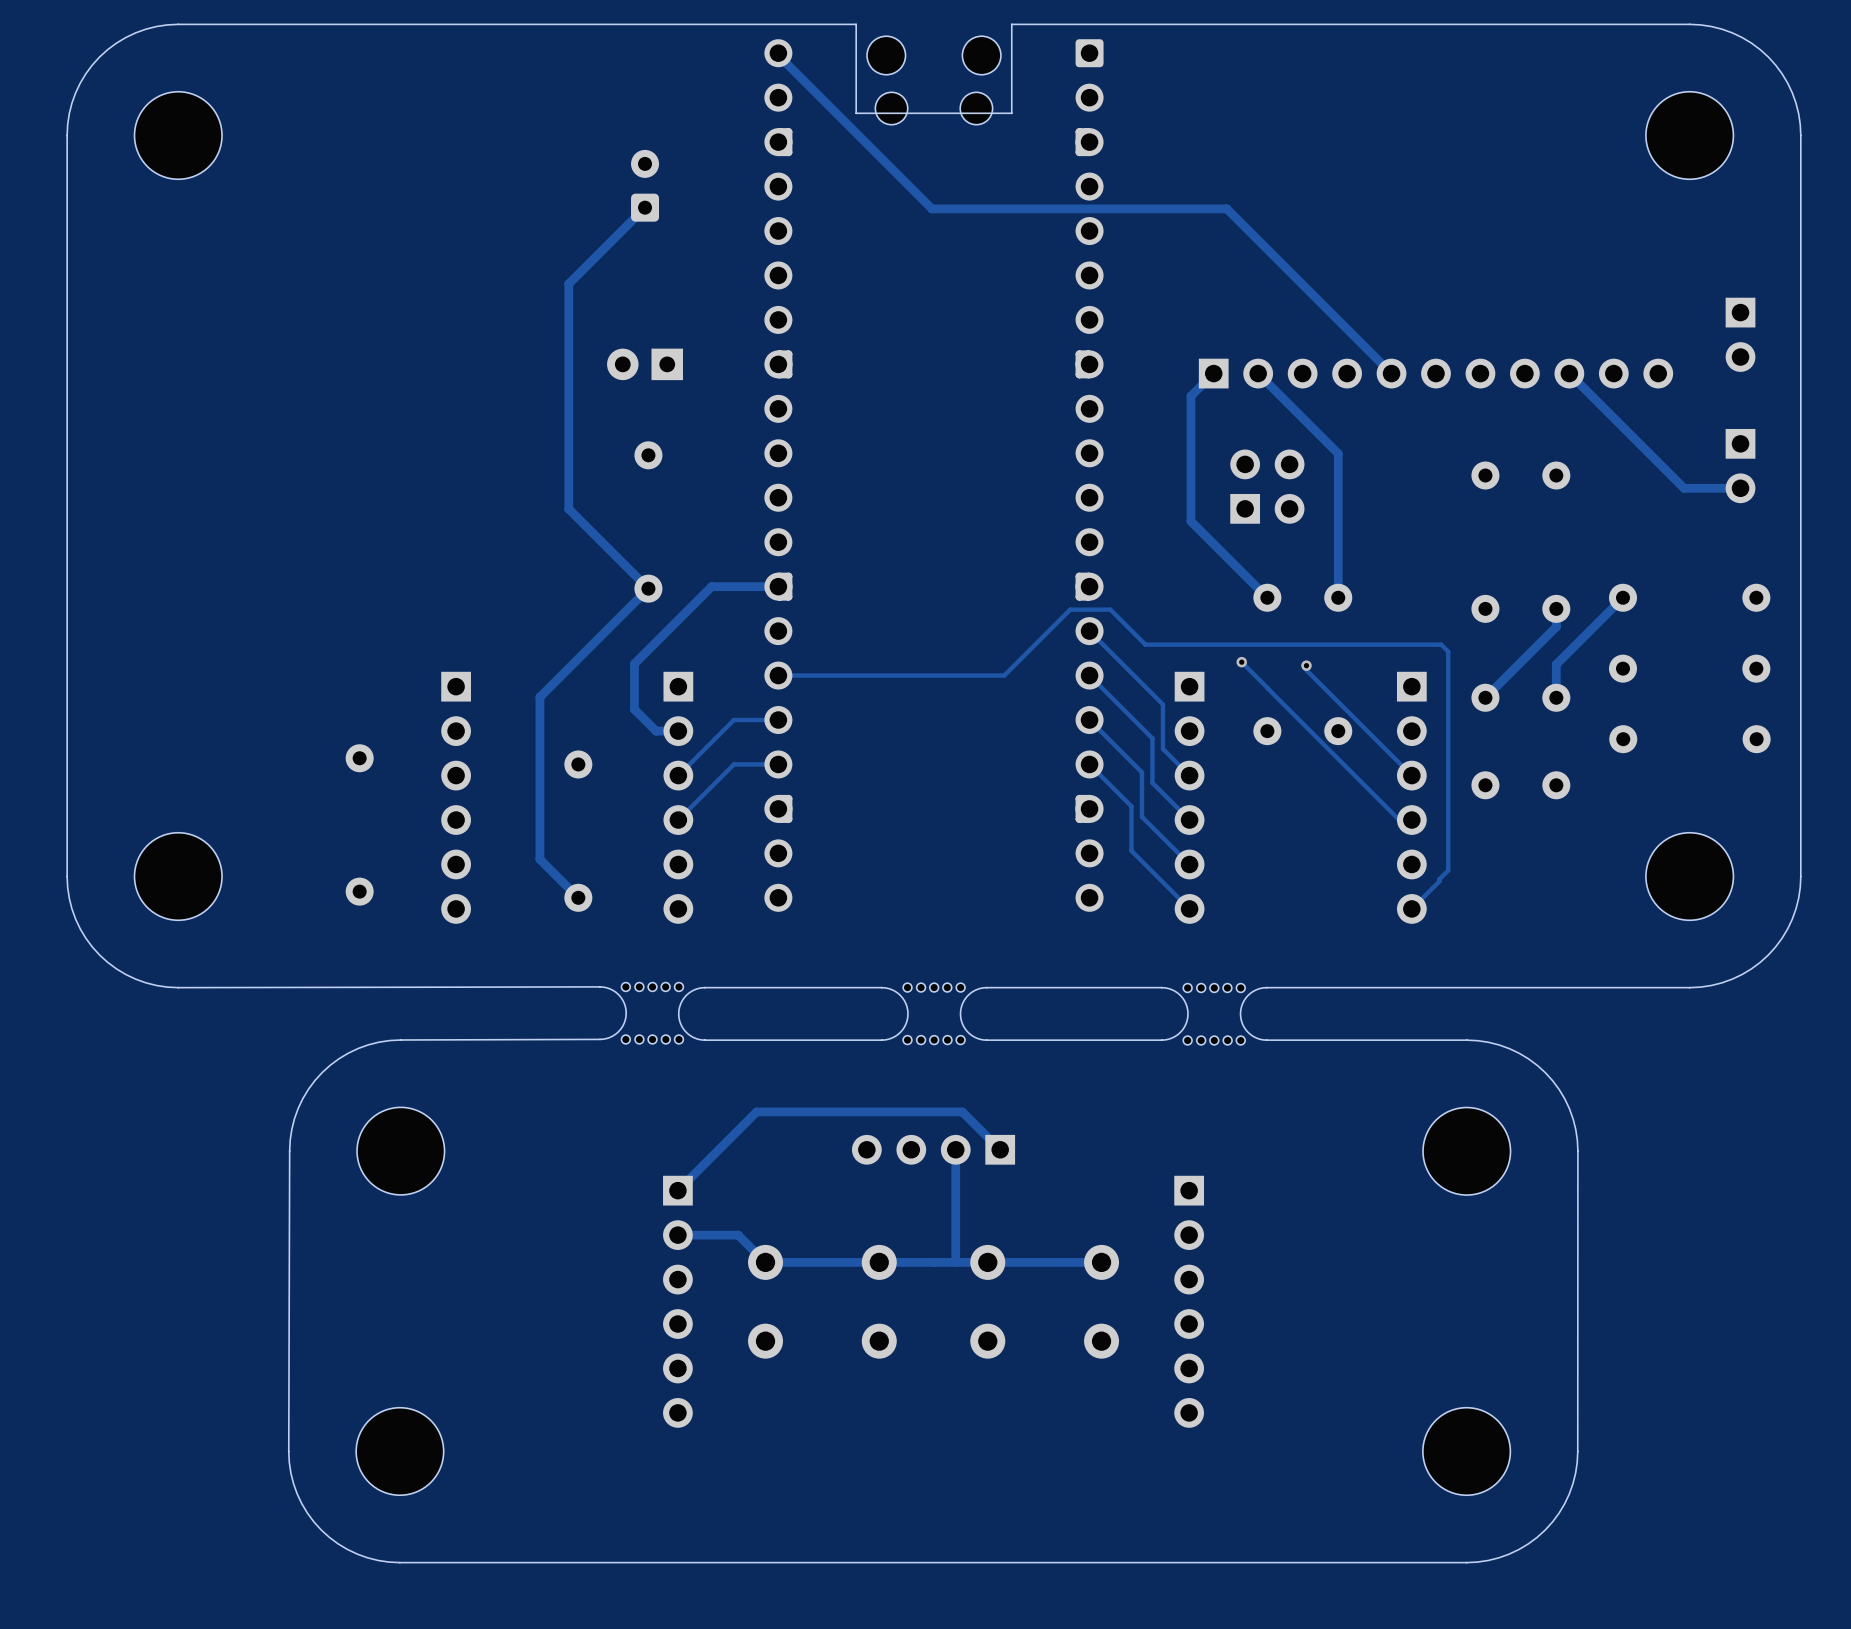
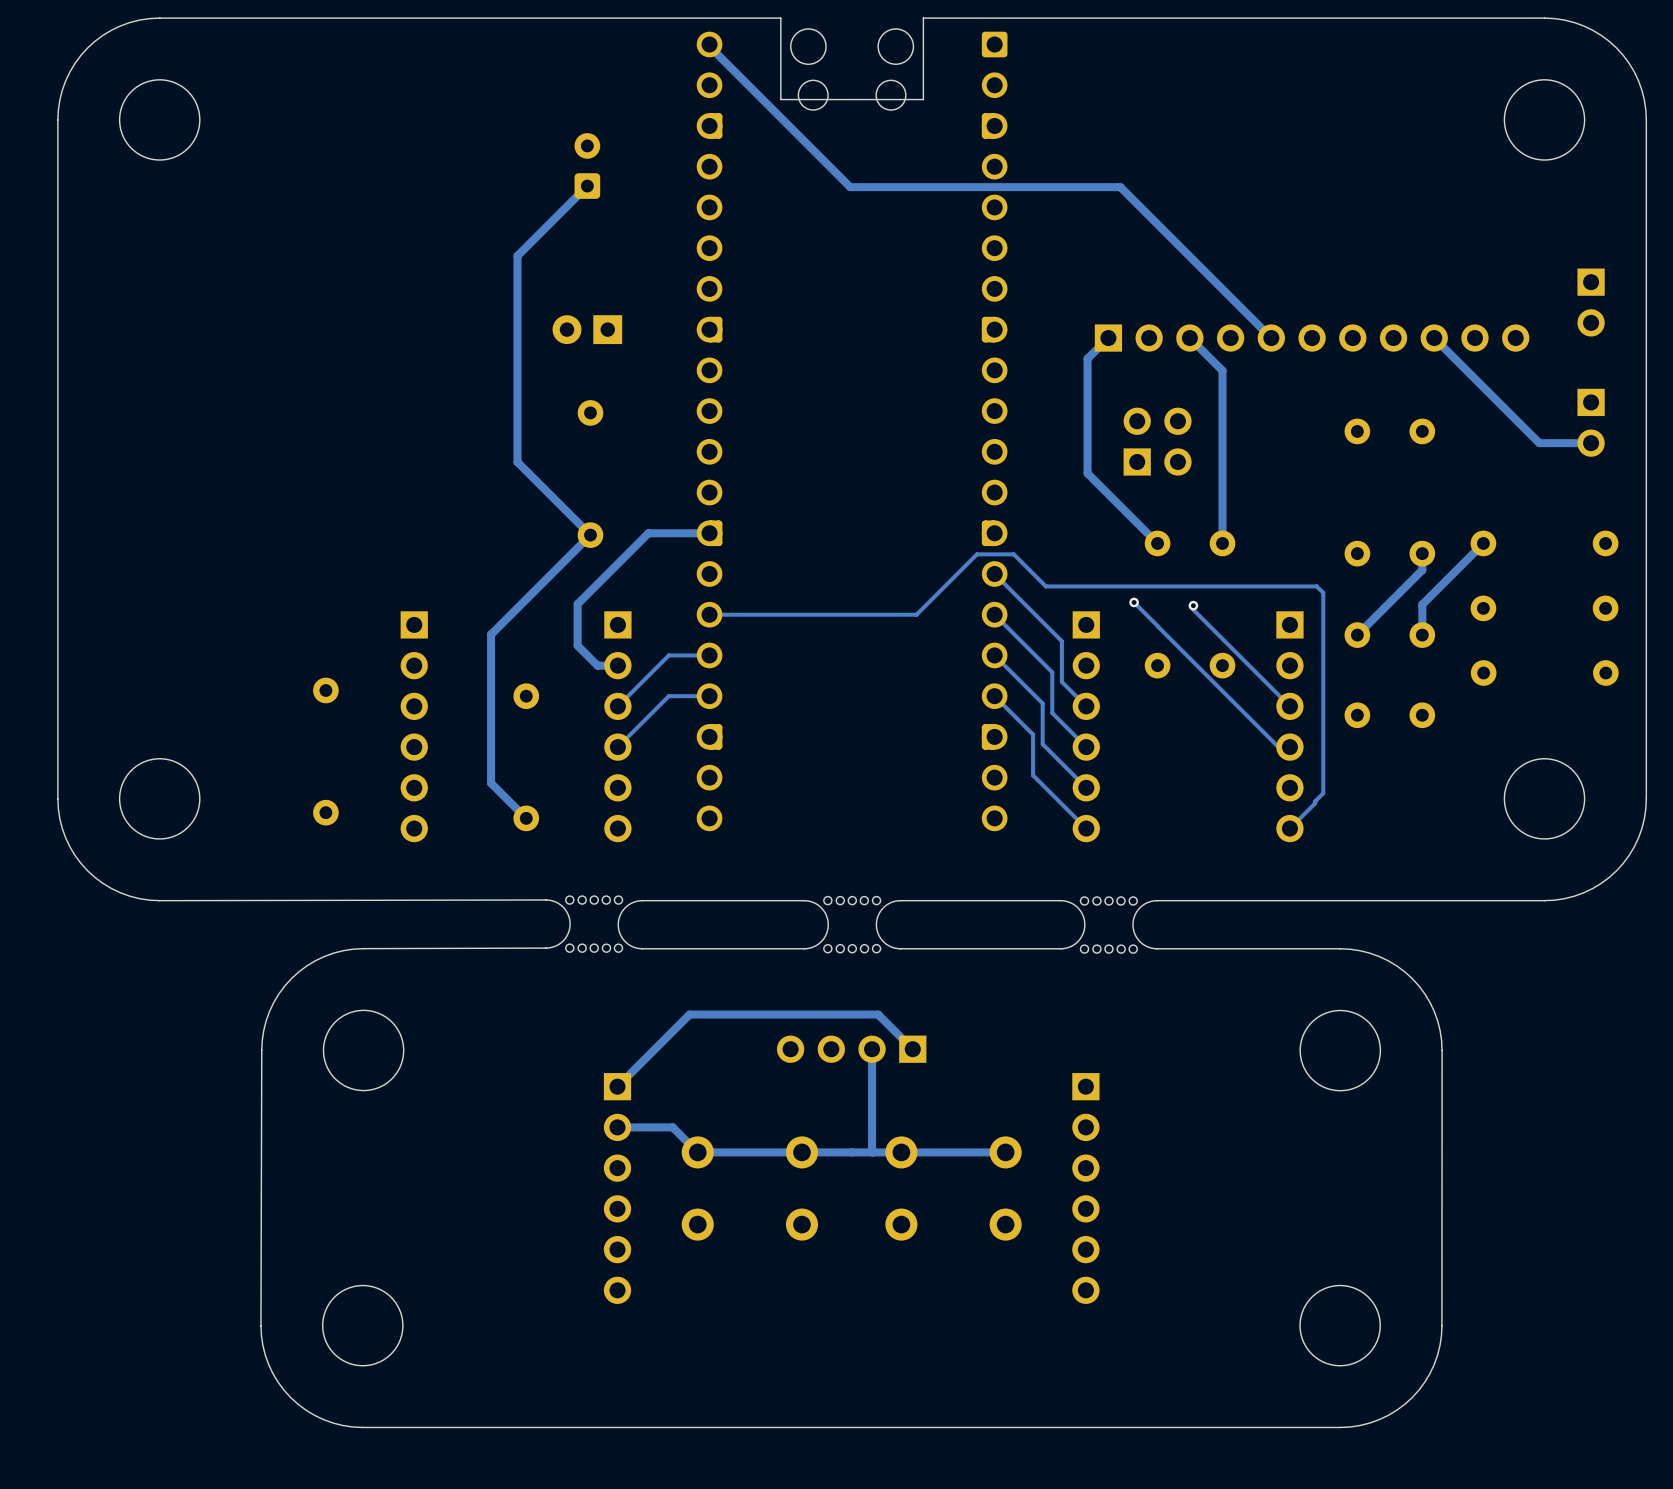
track: (1258, 373) (1338, 453) -> (1189, 338) (1222, 370) (1222, 411)

